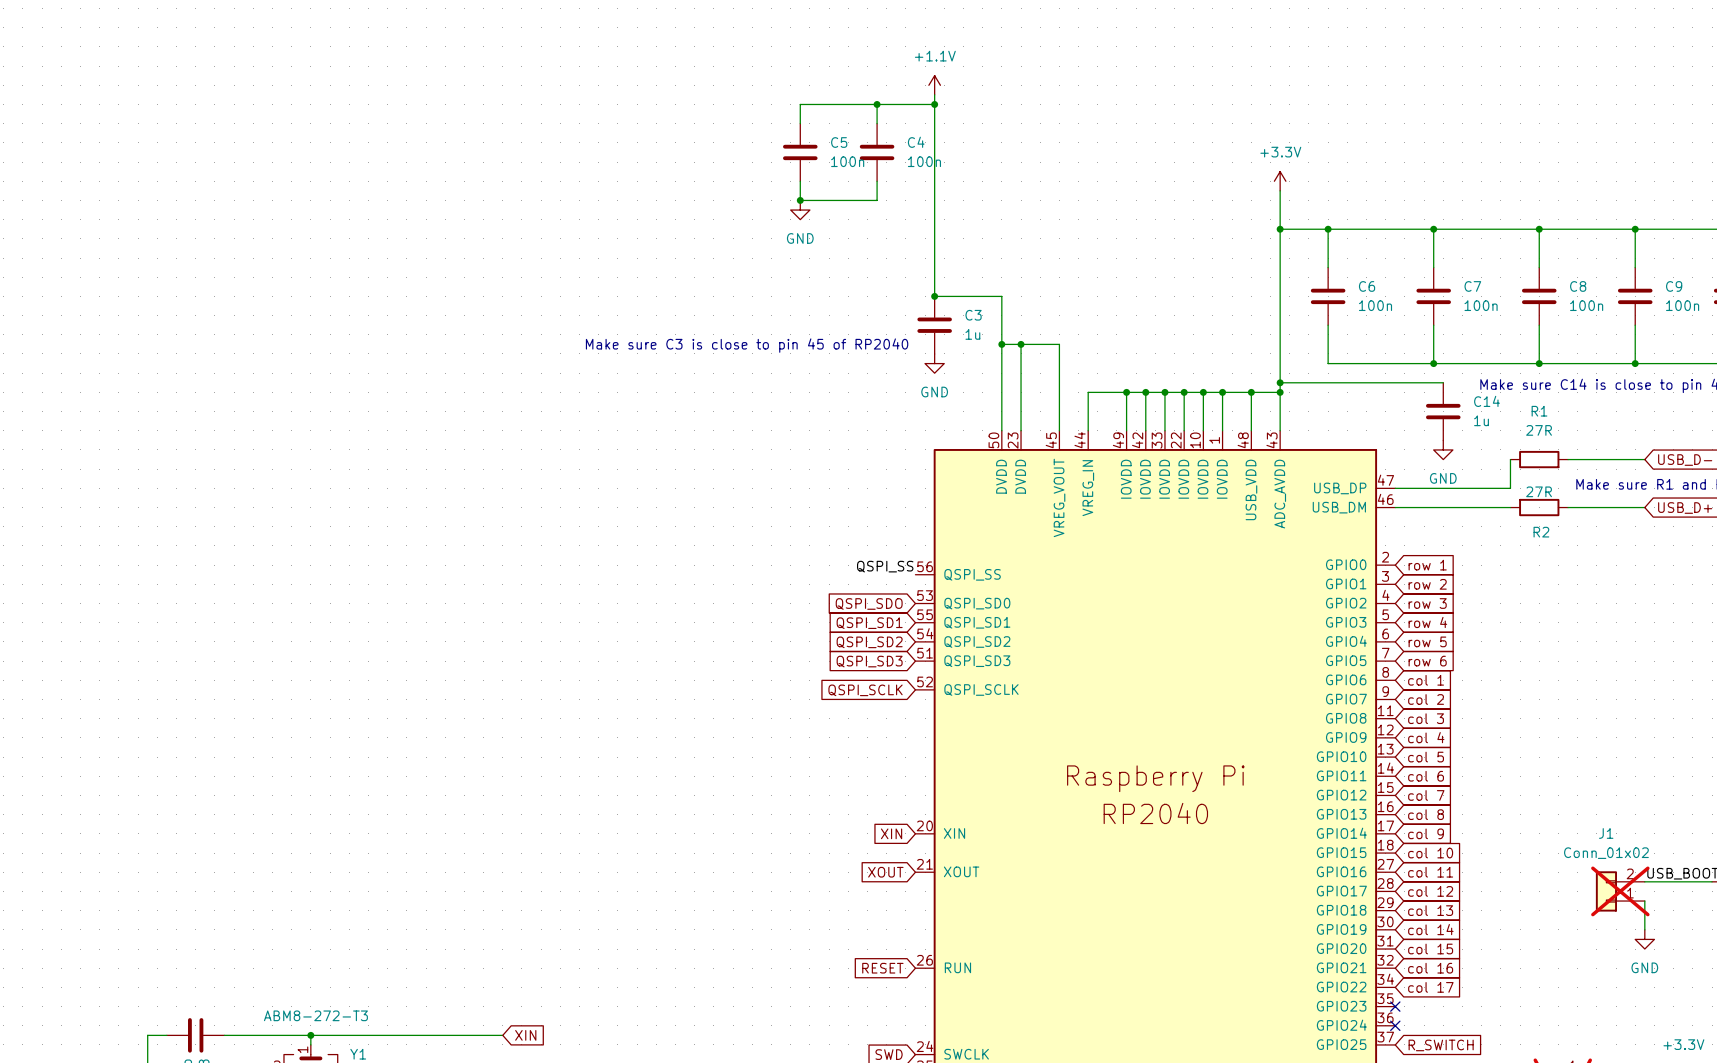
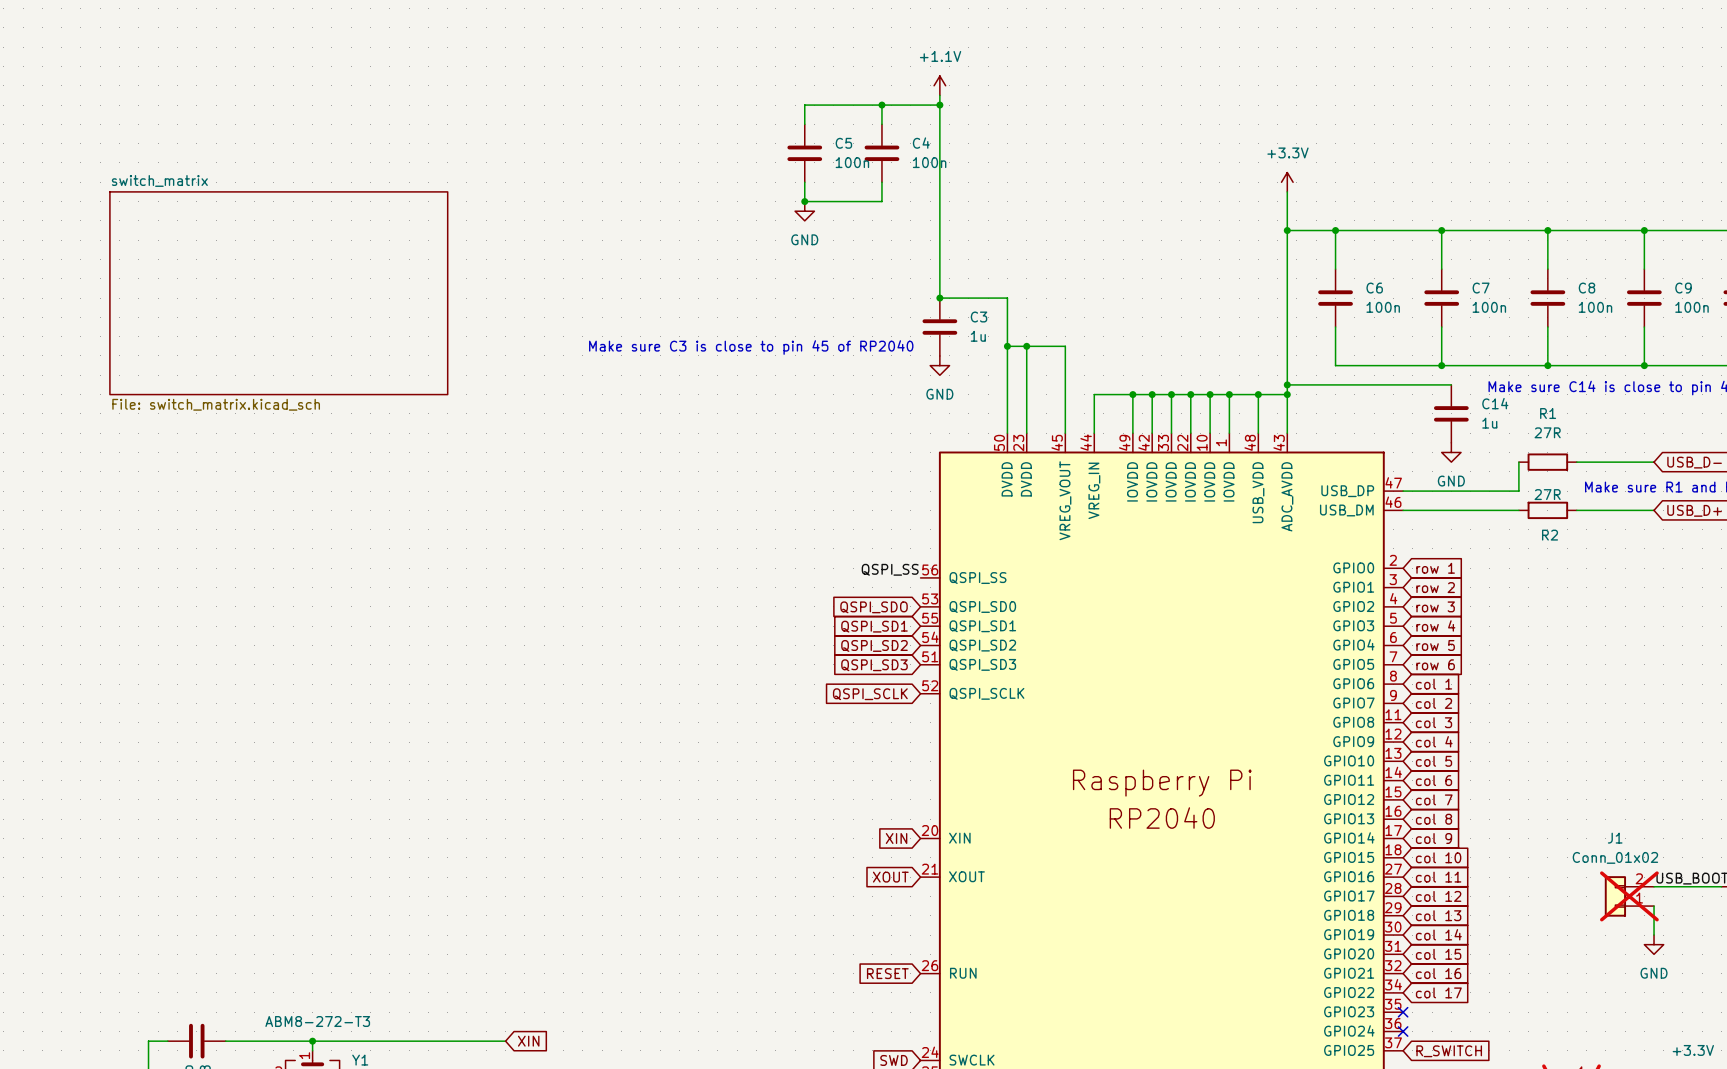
sheet switch_matrix: none -> File: switch_matrix.kicad_sch (278, 293)

